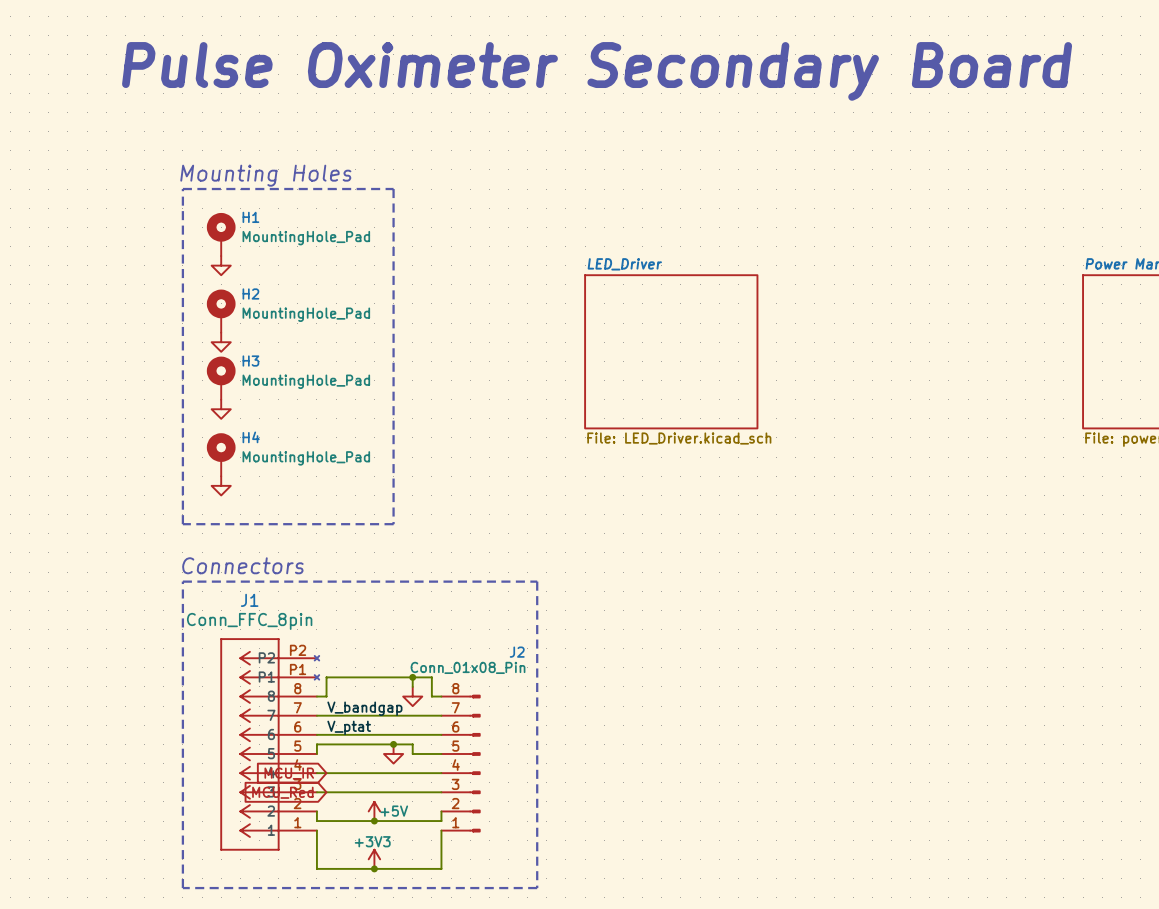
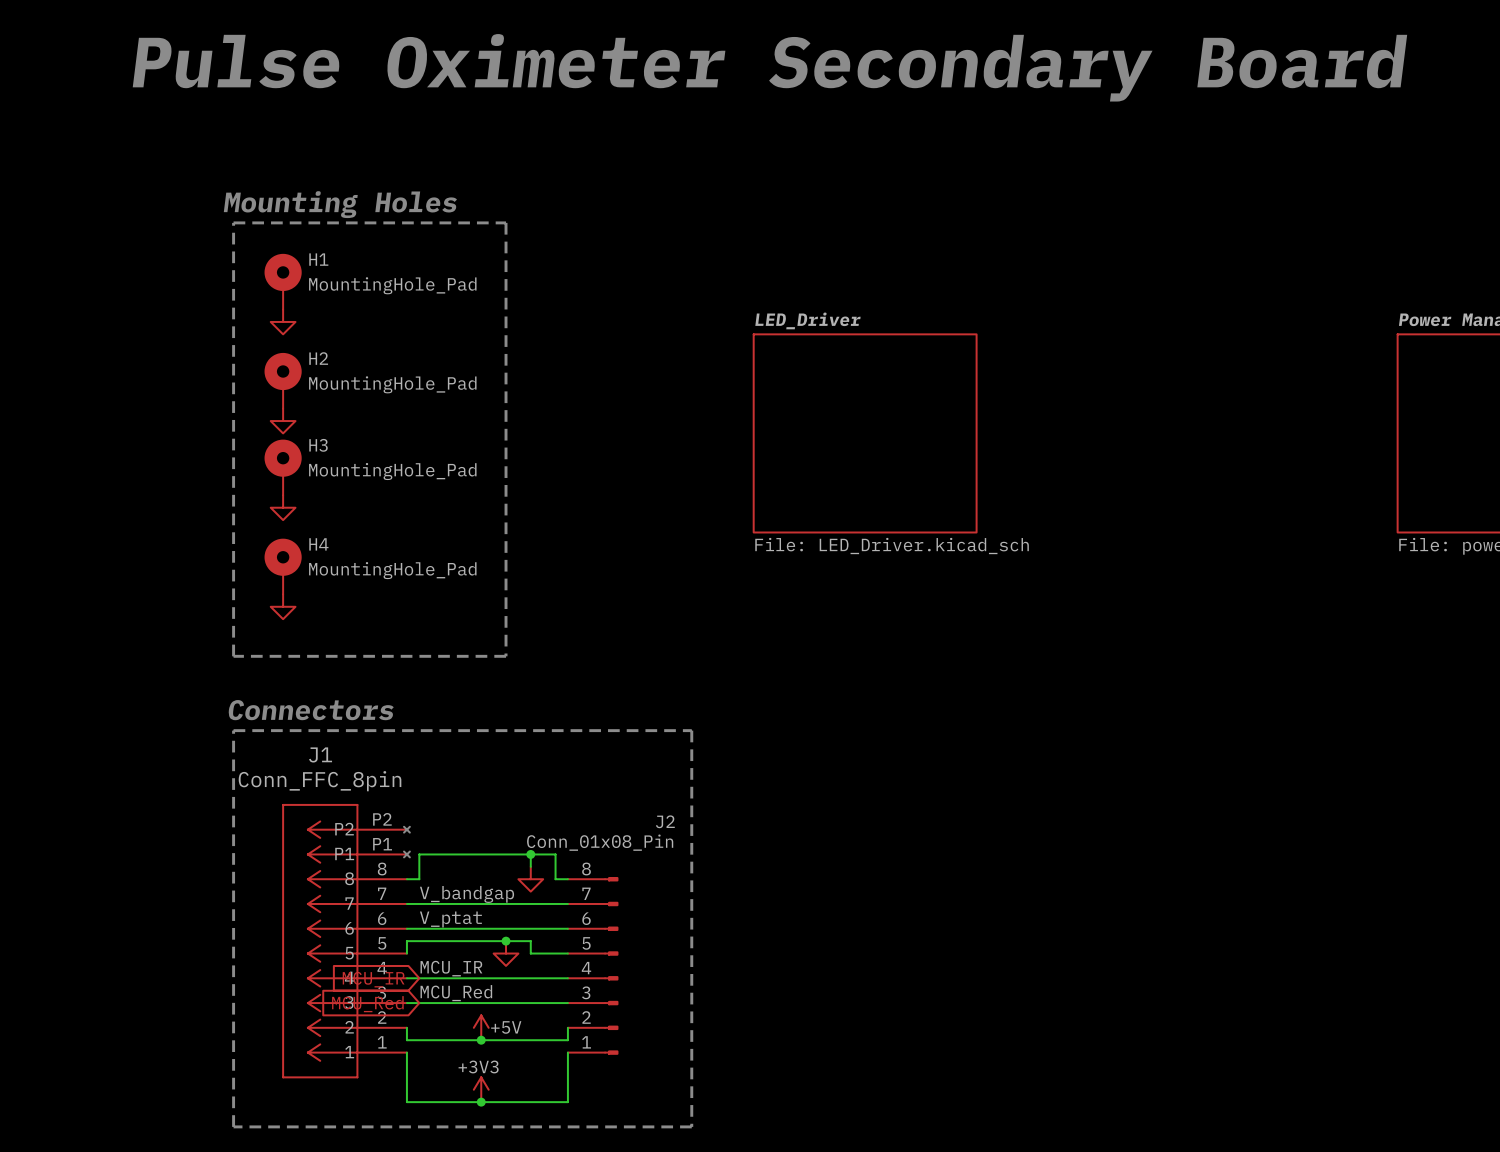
label: none -> MCU_IR (451, 968)
label: none -> MCU_Red (456, 993)

